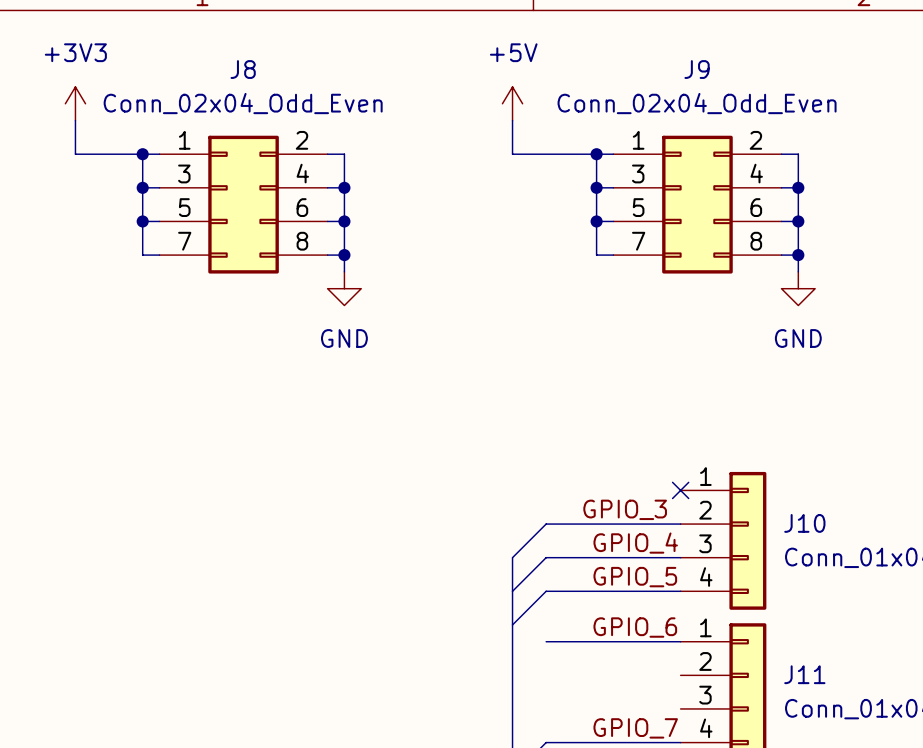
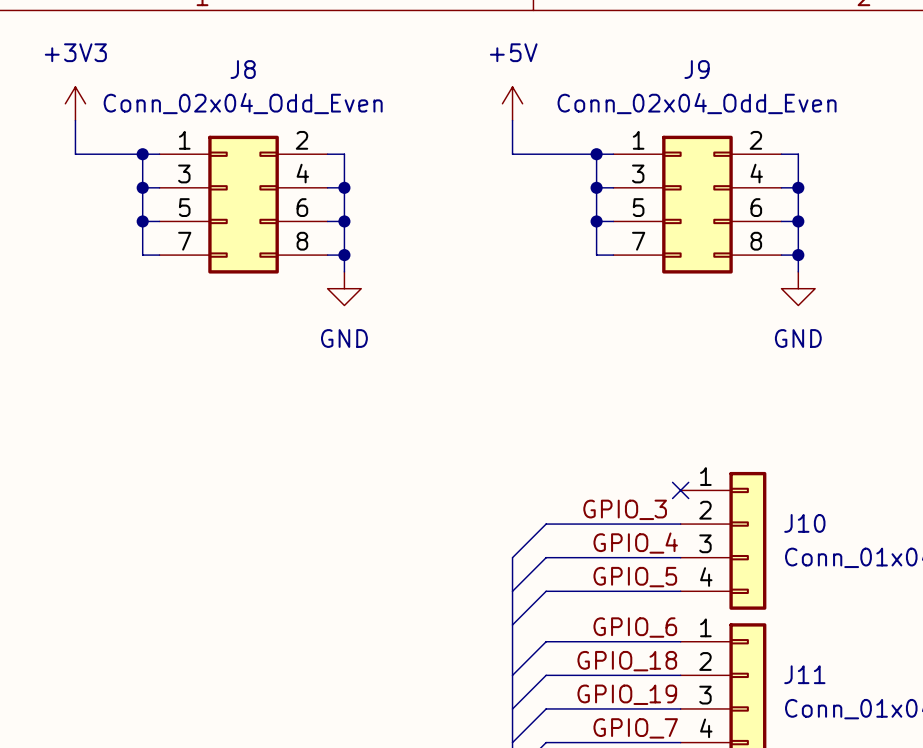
wire: none -> (546, 641) (512, 675)
label: none -> GPIO_18 (627, 661)
wire: none -> (680, 675) (546, 675) (512, 708)
label: none -> GPIO_19 (627, 694)
wire: none -> (680, 708) (546, 708) (512, 742)

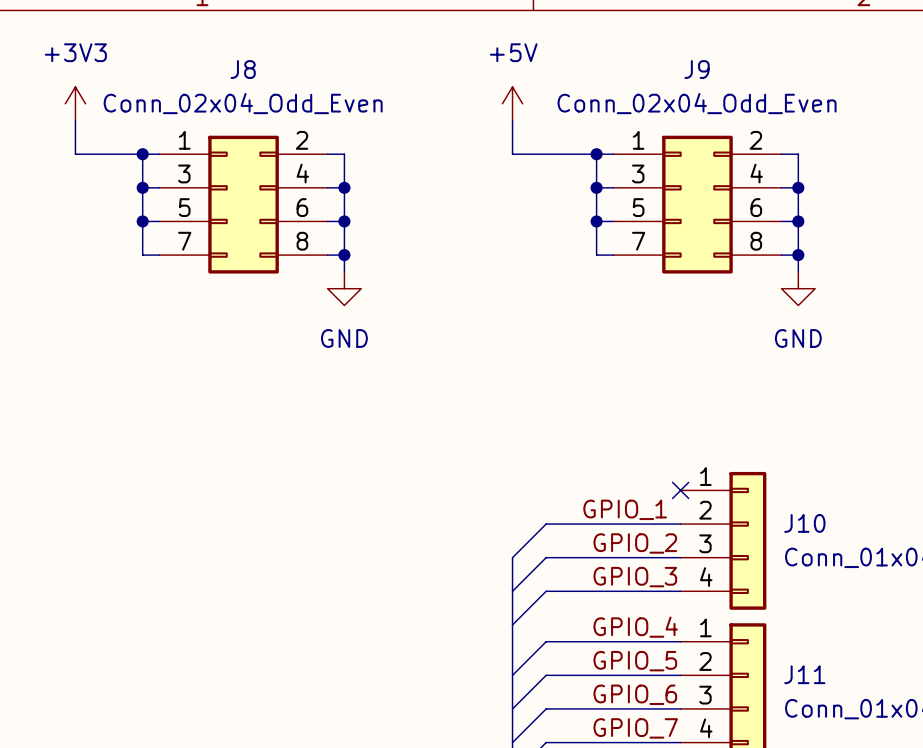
label: GPIO_3 (625, 509) -> GPIO_1 (625, 509)
label: GPIO_4 (635, 543) -> GPIO_2 (635, 543)
label: GPIO_5 (635, 577) -> GPIO_3 (635, 577)
label: GPIO_6 (635, 627) -> GPIO_4 (635, 627)
label: GPIO_18 (627, 661) -> GPIO_5 (635, 661)
label: GPIO_19 (627, 694) -> GPIO_6 (635, 694)

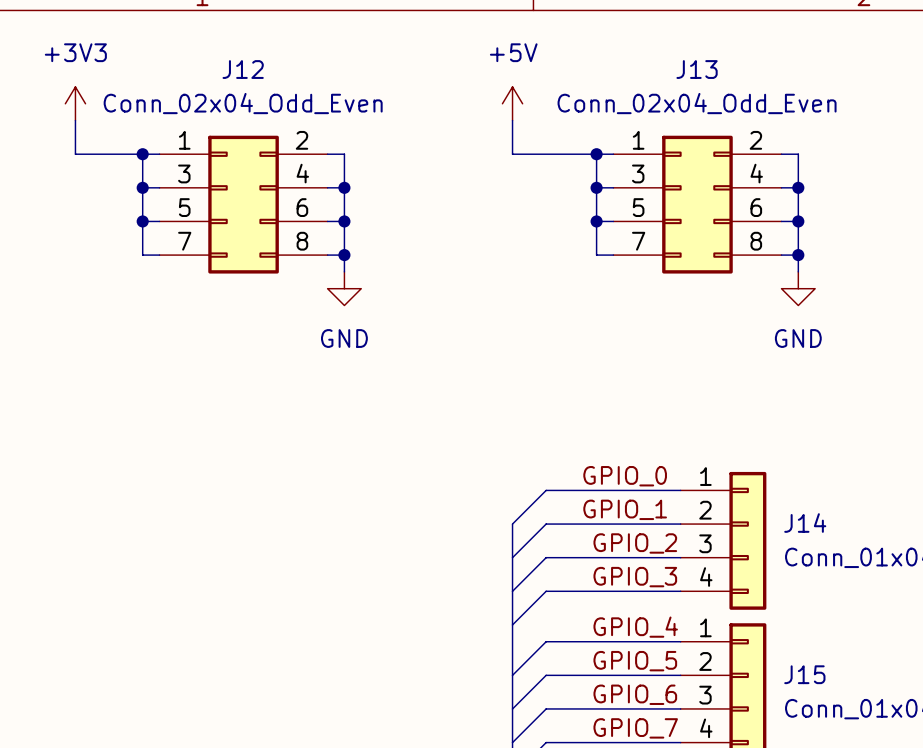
J8 name: J8 (243, 69) -> J12 (243, 69)
J9 name: J9 (697, 69) -> J13 (697, 69)
label: none -> GPIO_0 (625, 476)
wire: none -> (680, 490) (546, 490) (512, 524)
no-connect mark: (680, 490) -> none
J10 name: J10 (804, 523) -> J14 (805, 523)
bus: none -> (512, 524) (512, 557)
J11 name: J11 (804, 674) -> J15 (804, 674)

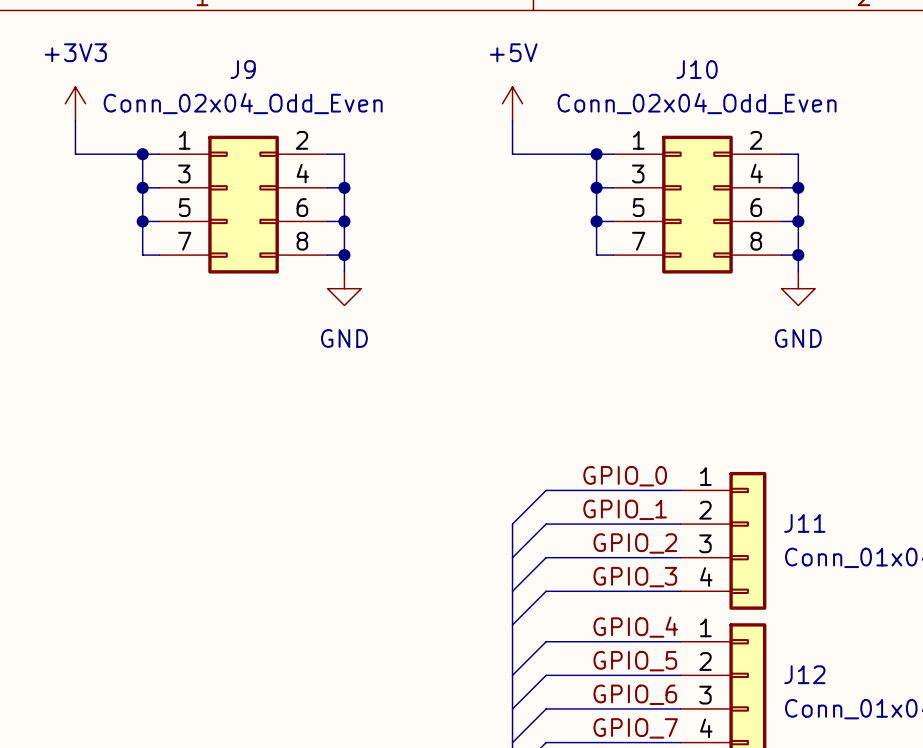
J12 name: J12 (243, 69) -> J9 (243, 69)
J13 name: J13 (697, 69) -> J10 (697, 69)
J14 name: J14 (805, 523) -> J11 (804, 523)
J15 name: J15 (804, 674) -> J12 (804, 674)

